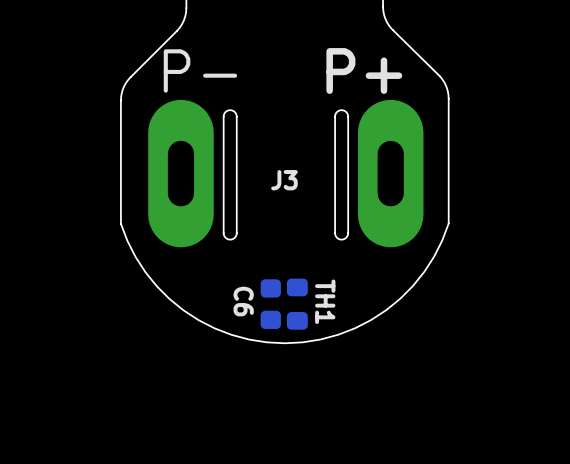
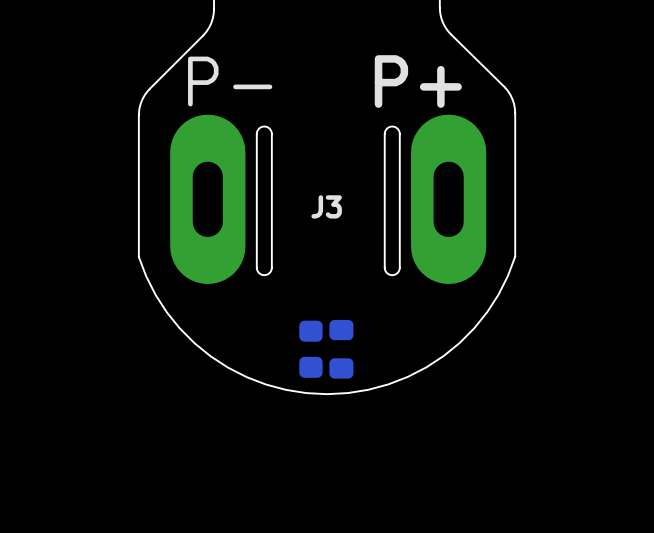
C6 name: C6 (243, 301) -> none
TH1 name: TH1 (325, 301) -> none

